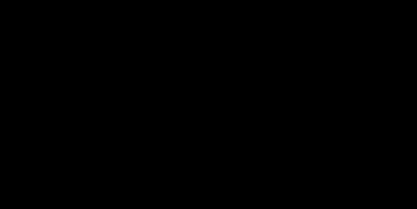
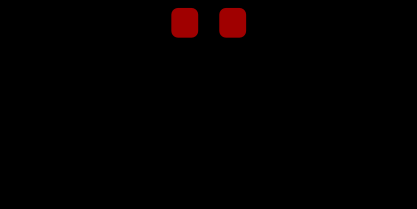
part: none -> (208, 22)

